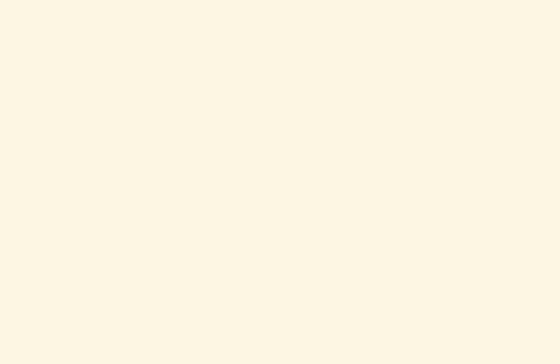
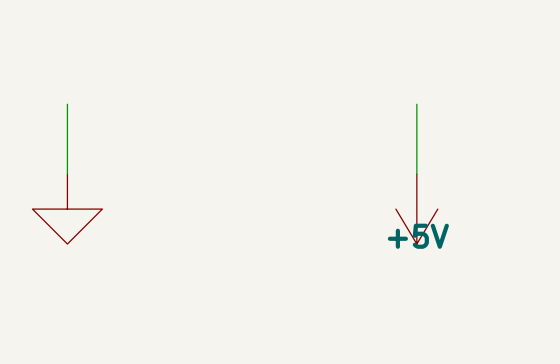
wire: none -> (67, 104) (67, 174)
wire: none -> (416, 104) (416, 174)
power symbol: none -> (67, 209)
power symbol: none -> +5V (416, 209)

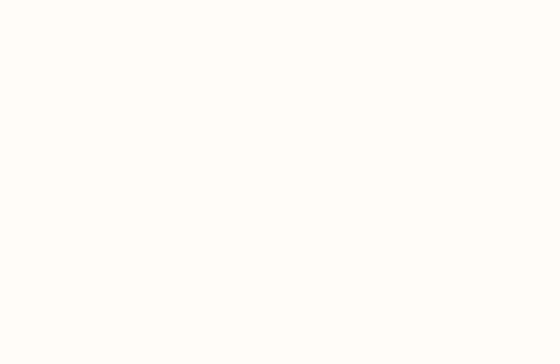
wire: (67, 104) (67, 174) -> none
wire: (416, 104) (416, 174) -> none
power symbol: (67, 209) -> none
power symbol: +5V (416, 209) -> none

